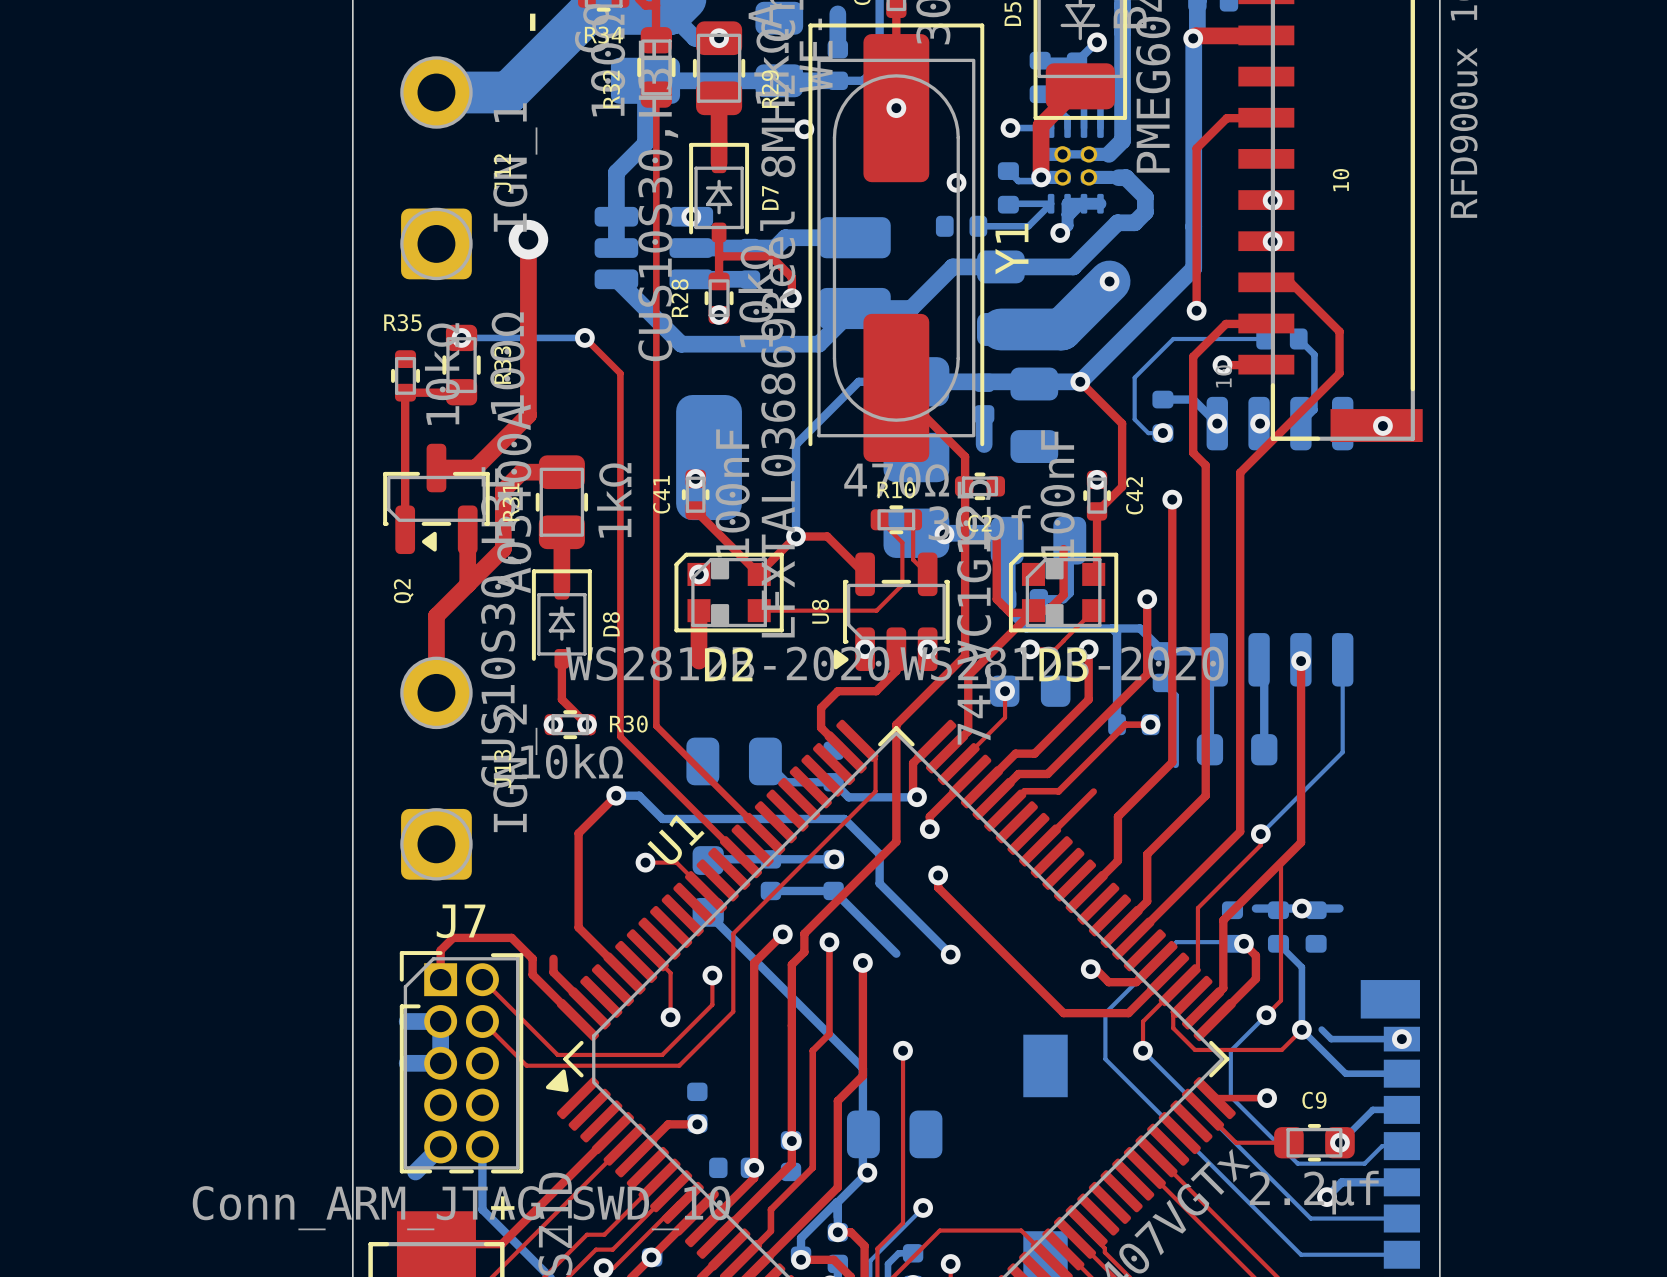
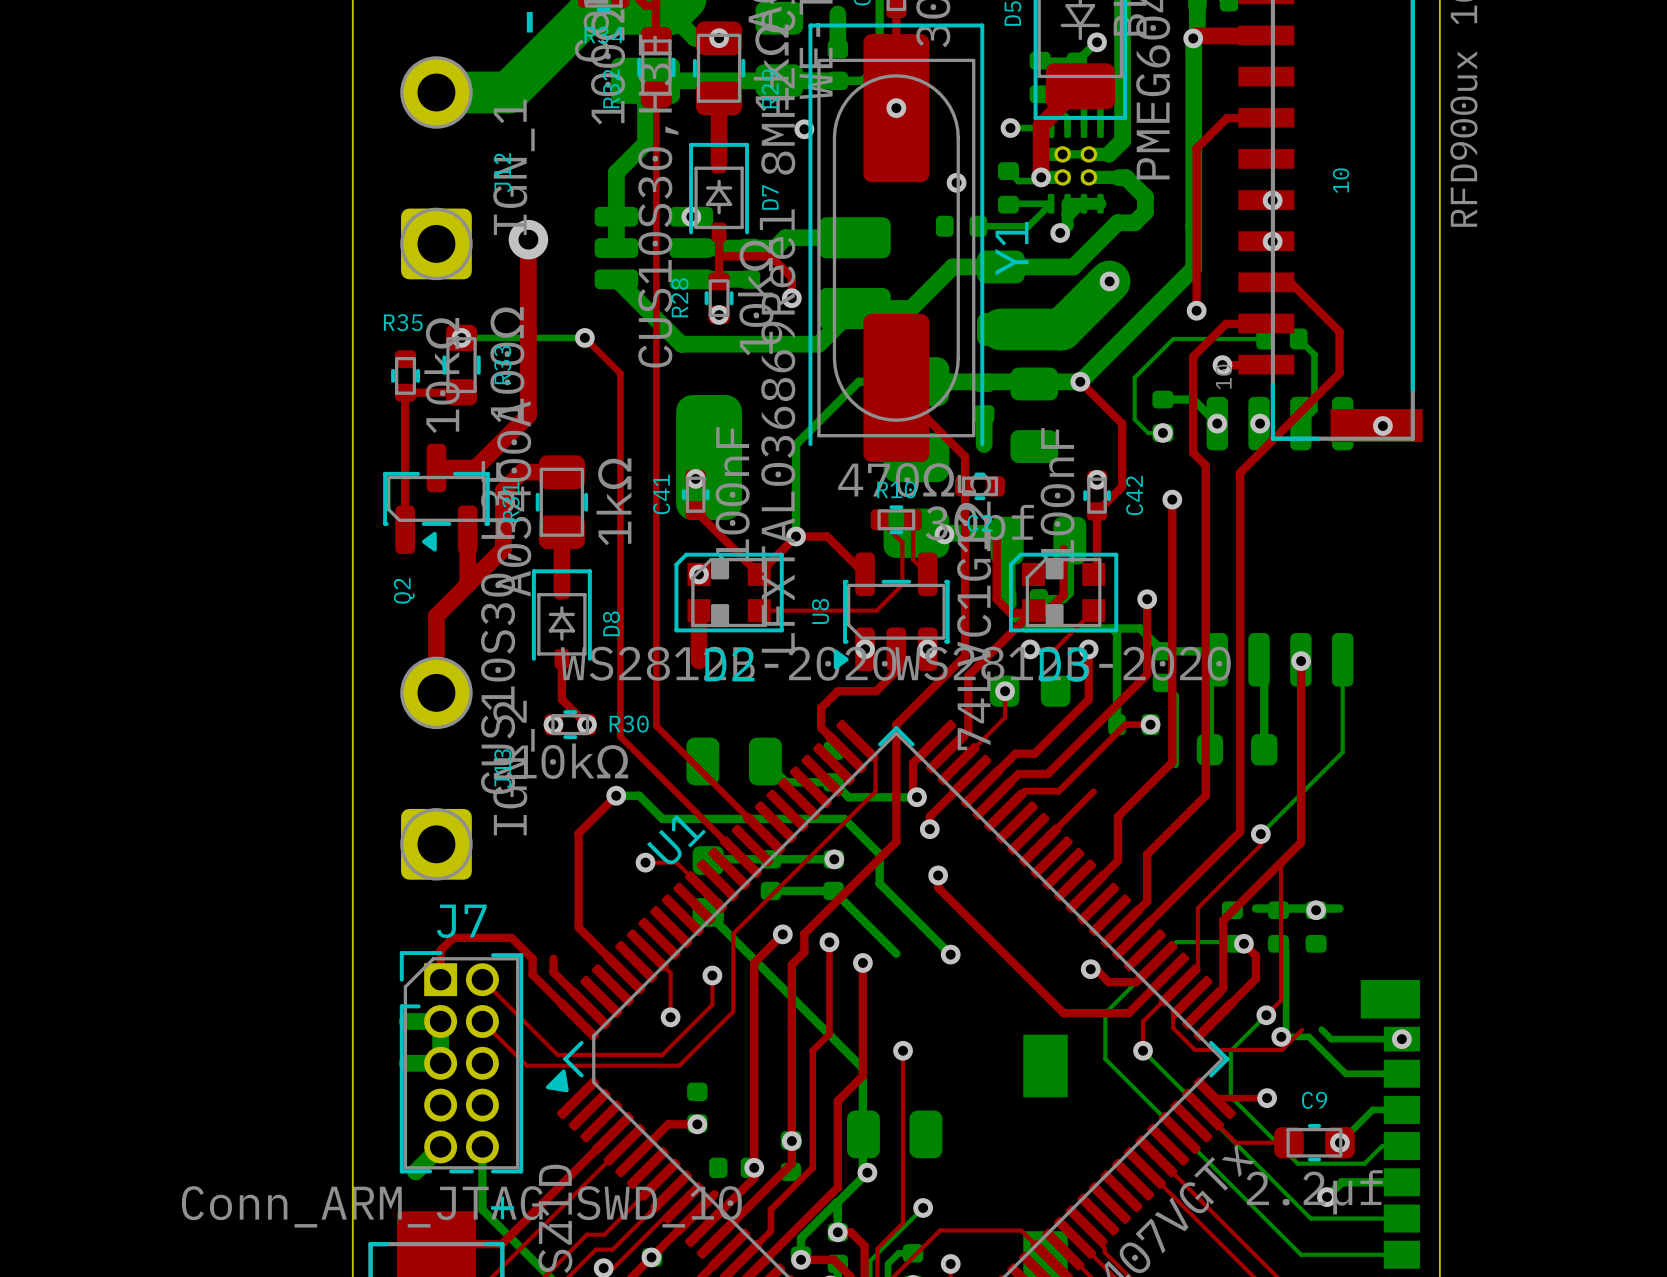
via position: (1301, 908) -> (1316, 910)
bottom track: (1286, 951) (1301, 967) (1301, 1029) (1308, 1036) -> (1286, 951) (1286, 1032) (1281, 1036) (1308, 1036)
via position: (1301, 1029) -> (1281, 1036)

